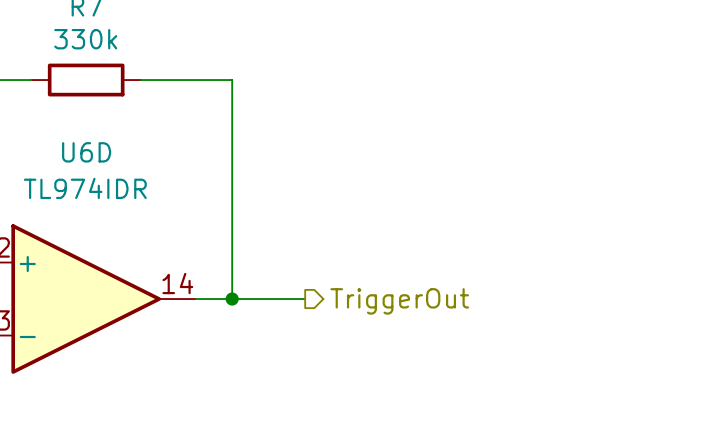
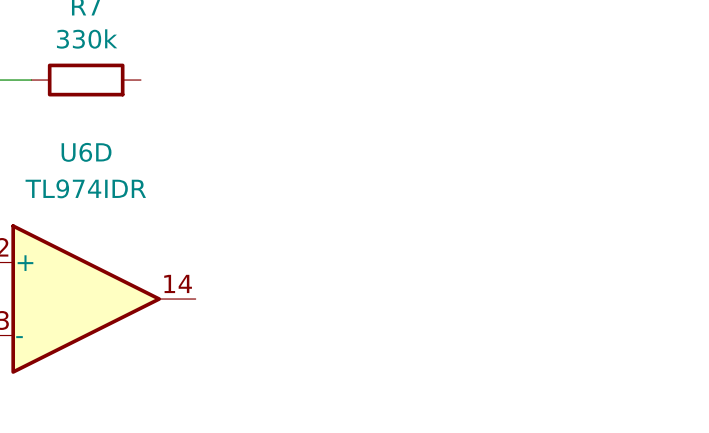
wire: (140, 80) (232, 80) (232, 299) -> none
wire: (195, 299) (305, 299) -> none
junction: (232, 299) -> none
hierarchical label: TriggerOut (399, 301) -> none

